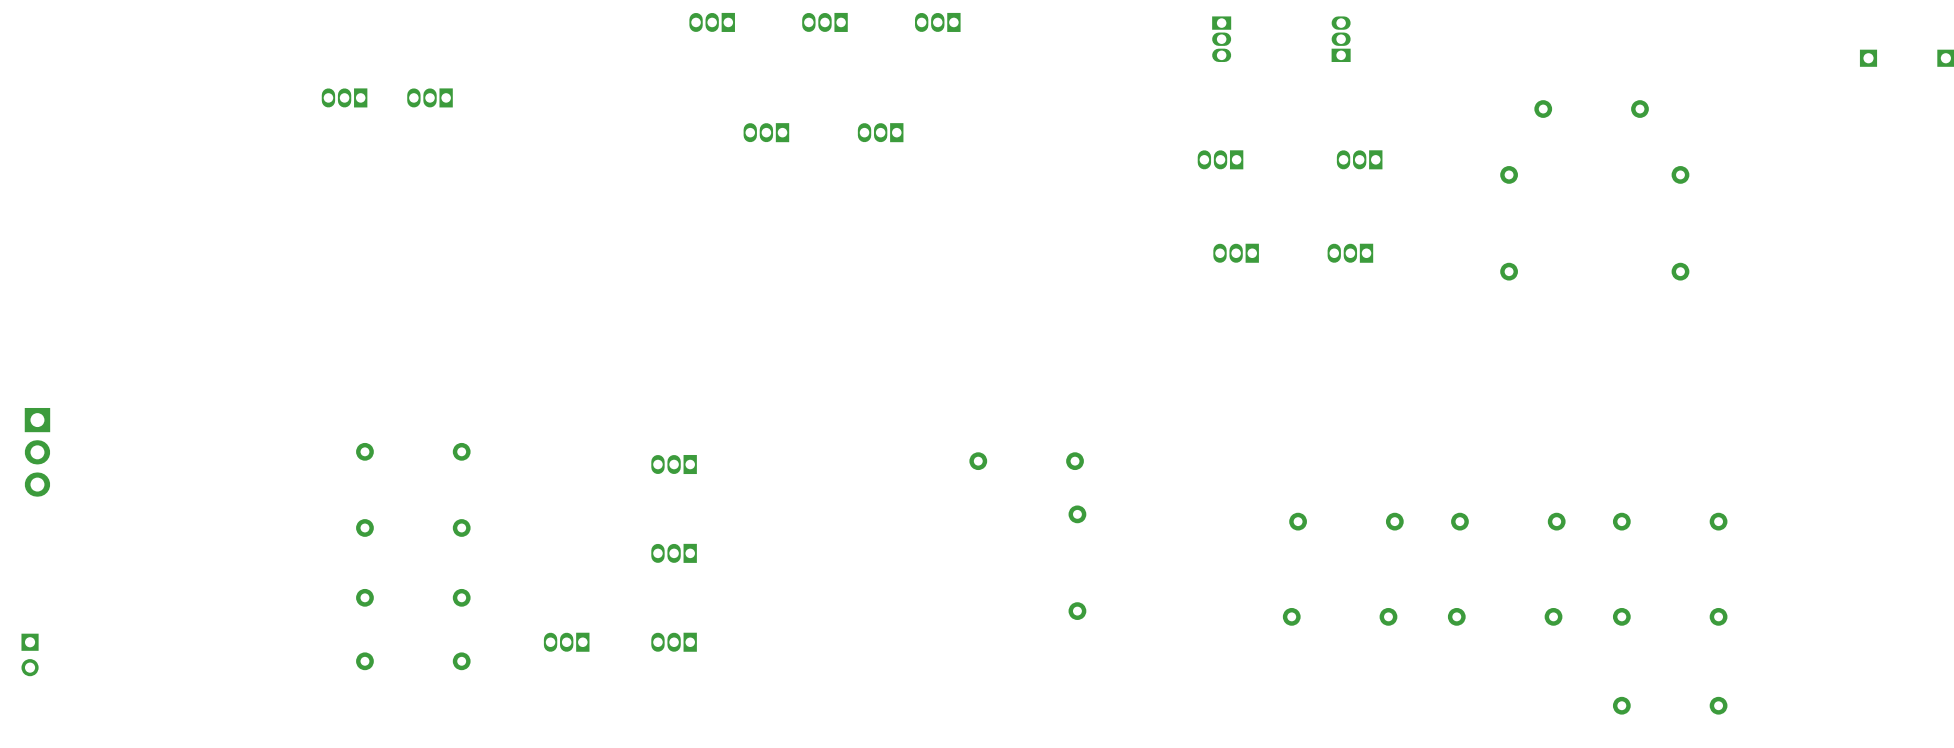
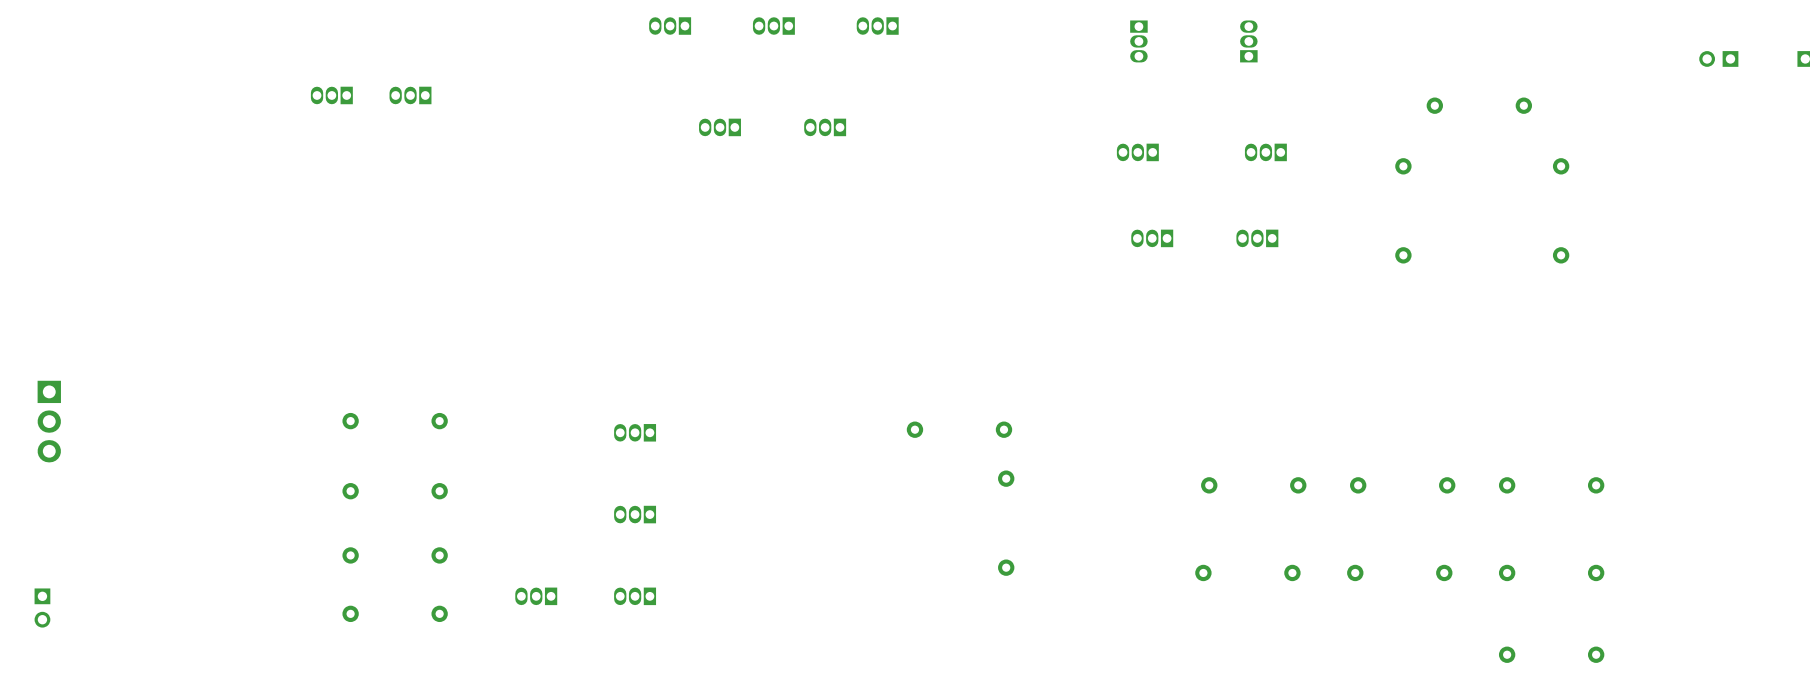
part: none -> (1718, 58)
part: (1868, 58) -> none

